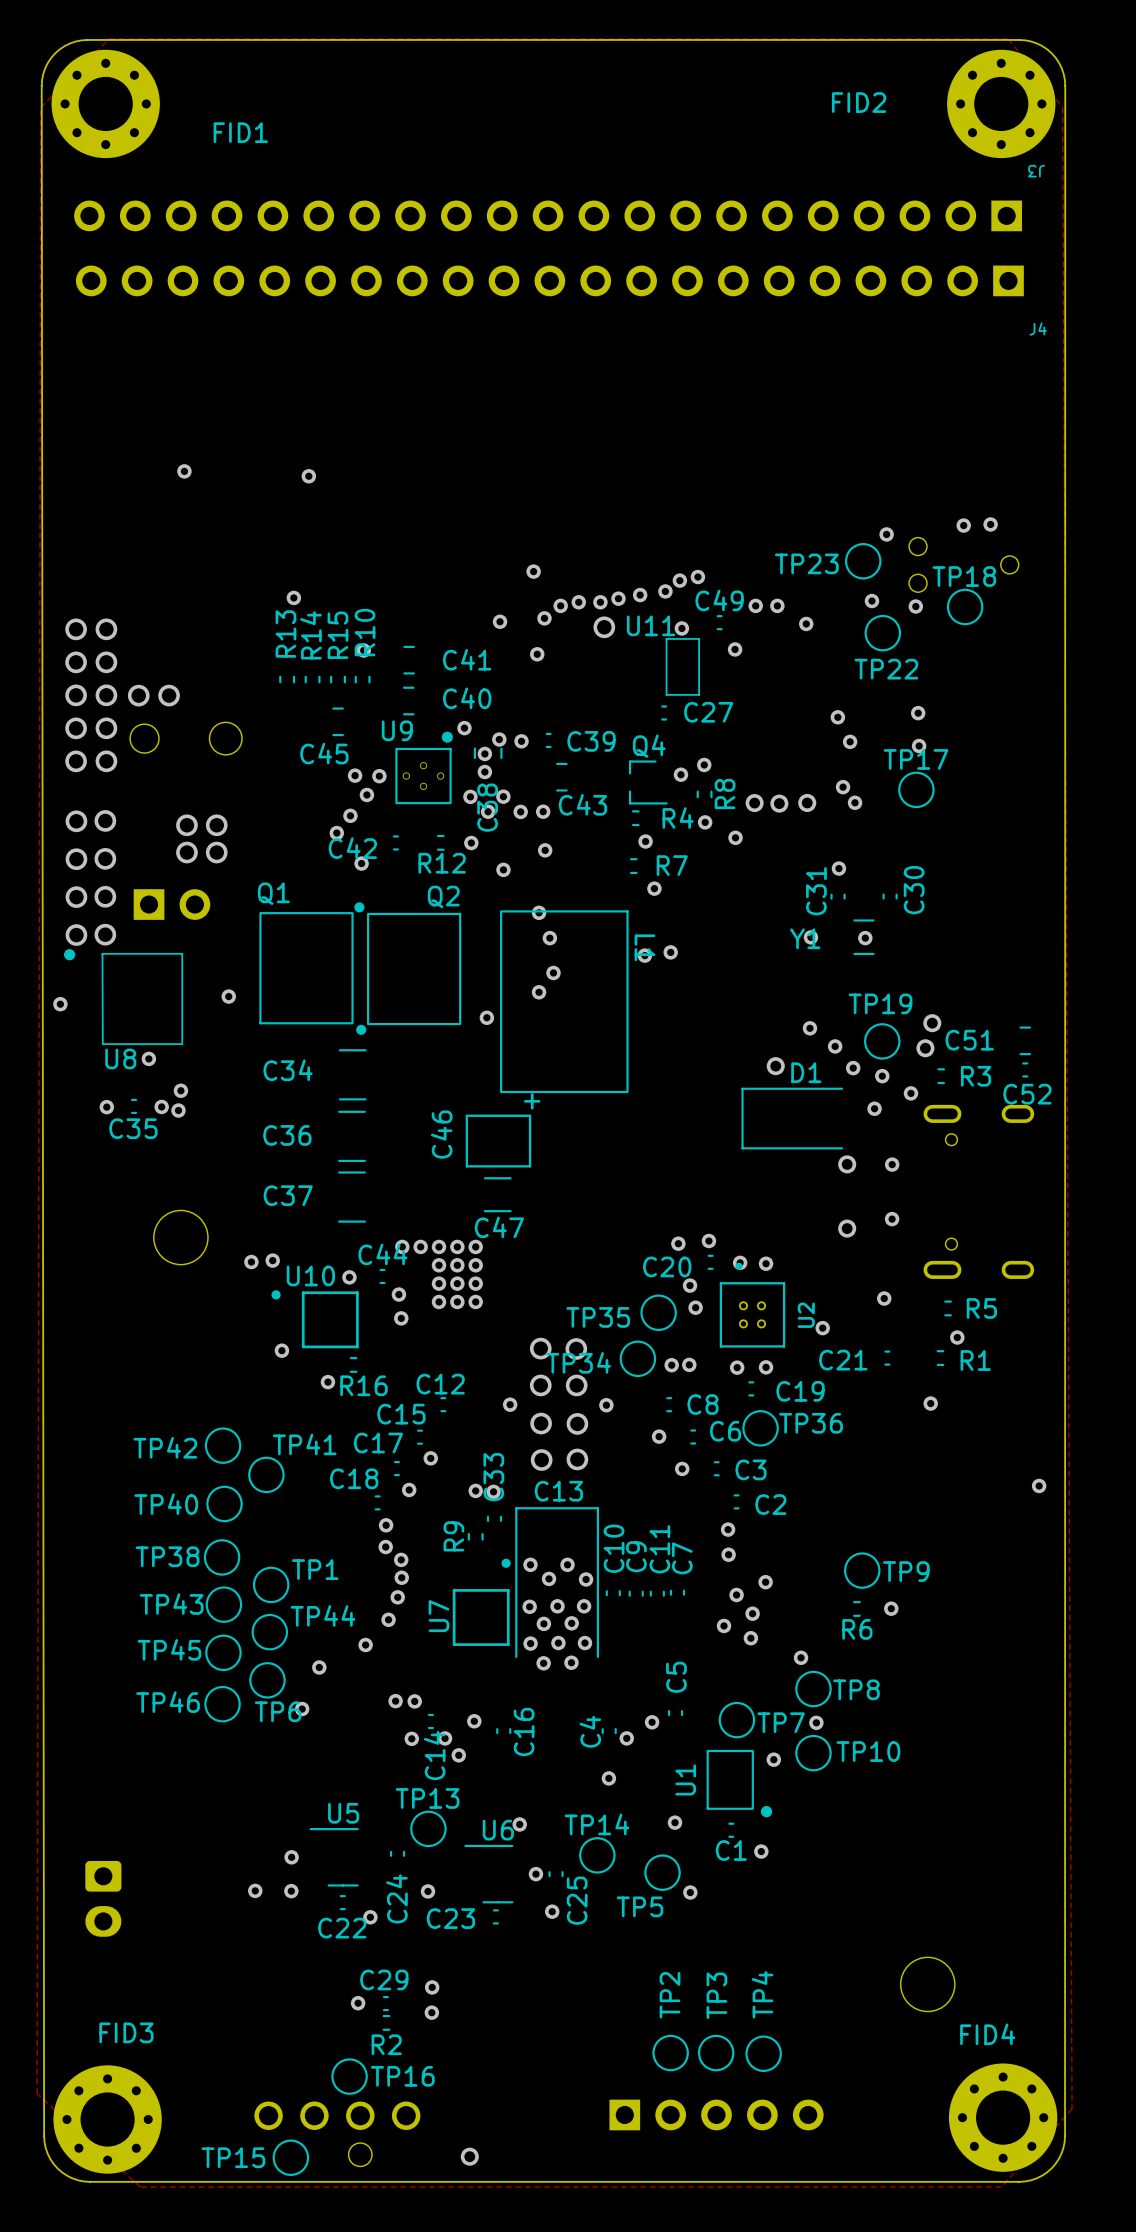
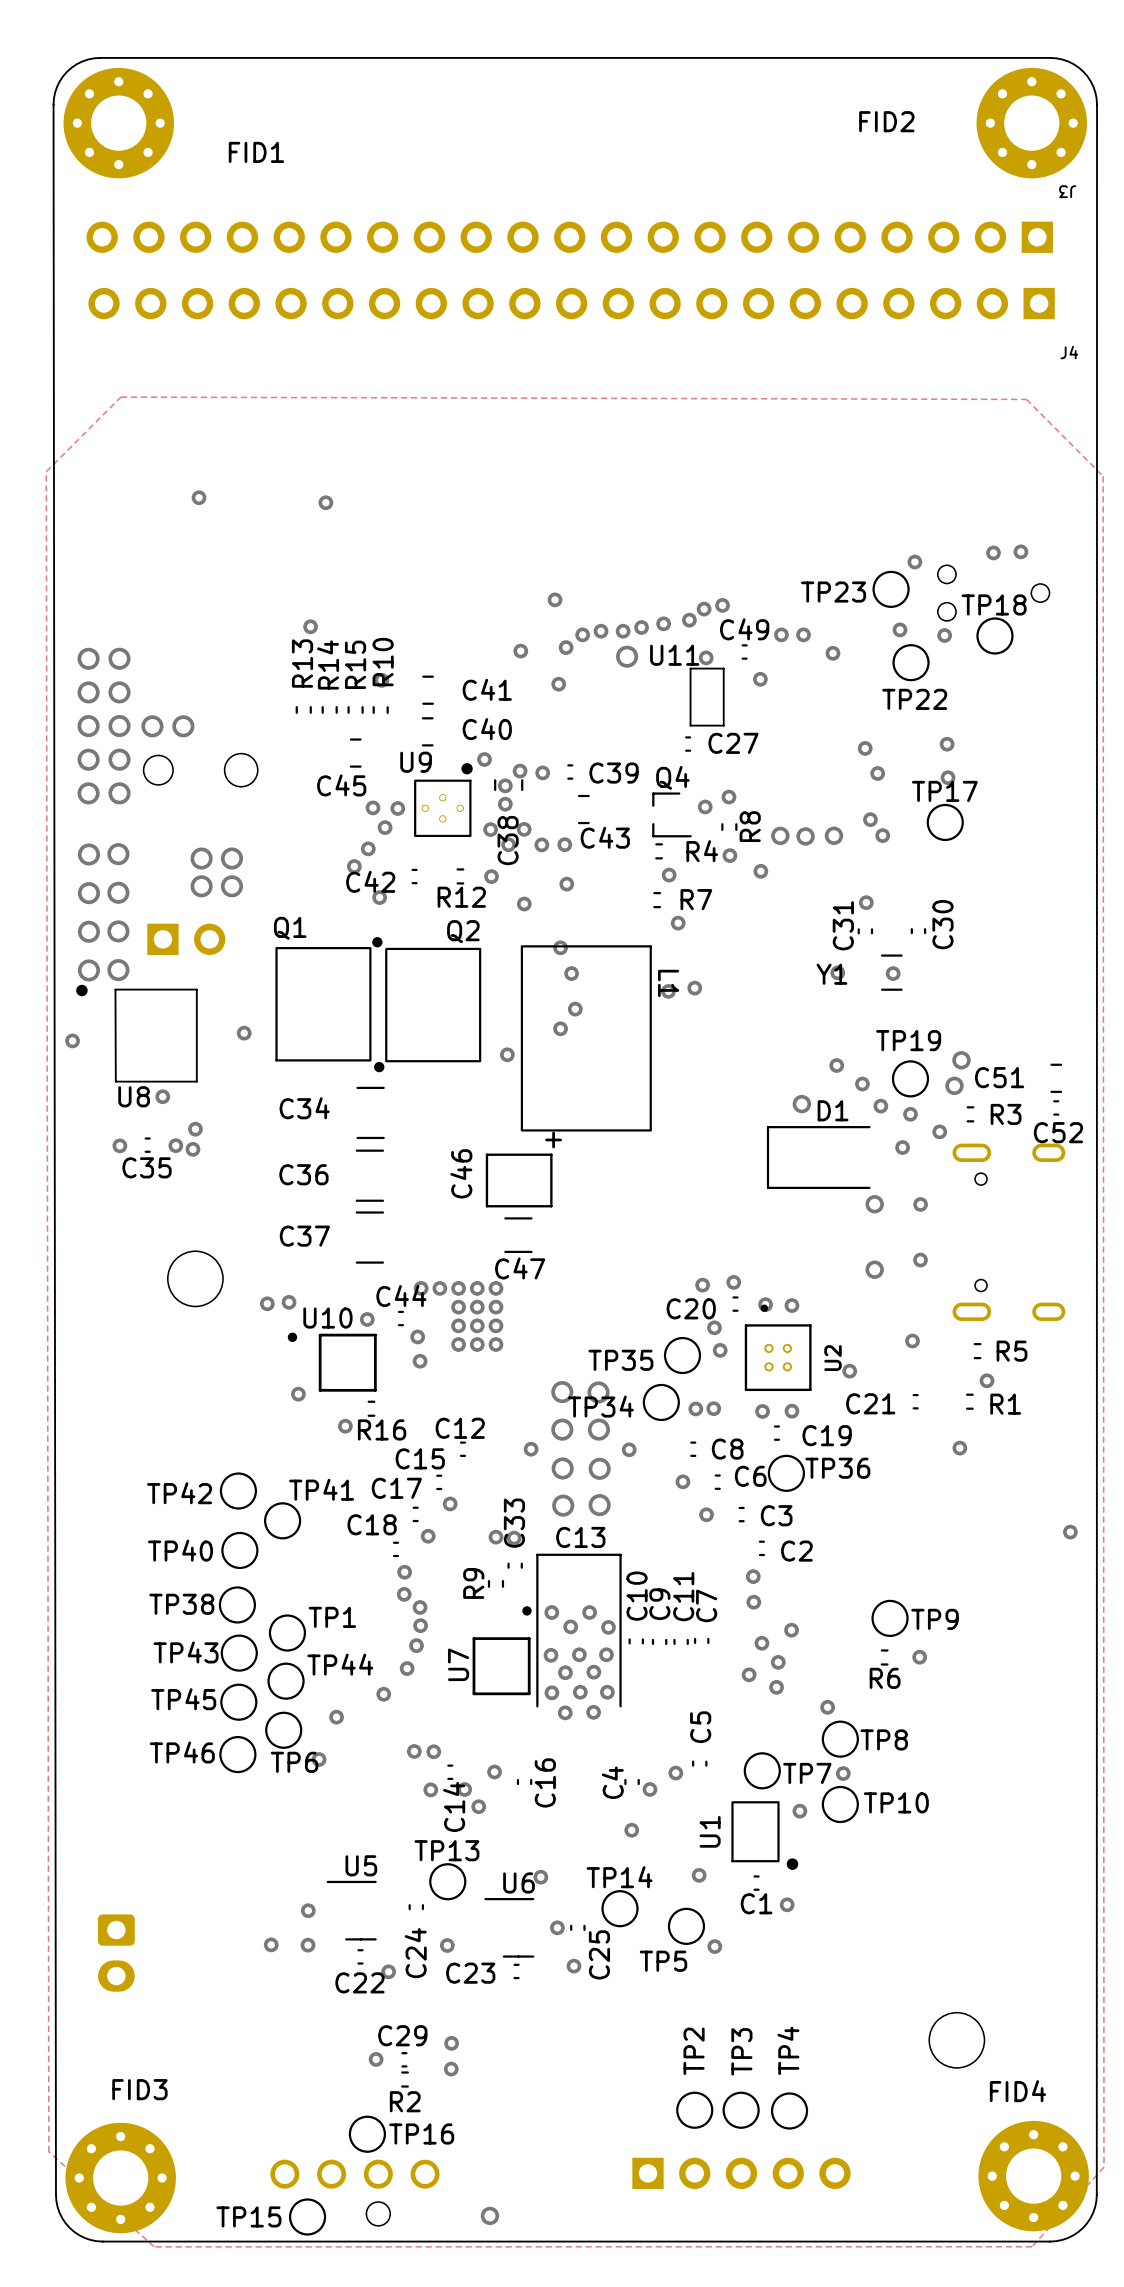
zone outline: (37, 2093) (40, 107) (109, 38) (1008, 38) (1062, 107) (1072, 2108) -> (48, 2151) (46, 471) (120, 397) (1026, 399) (1103, 476) (1103, 2167)

